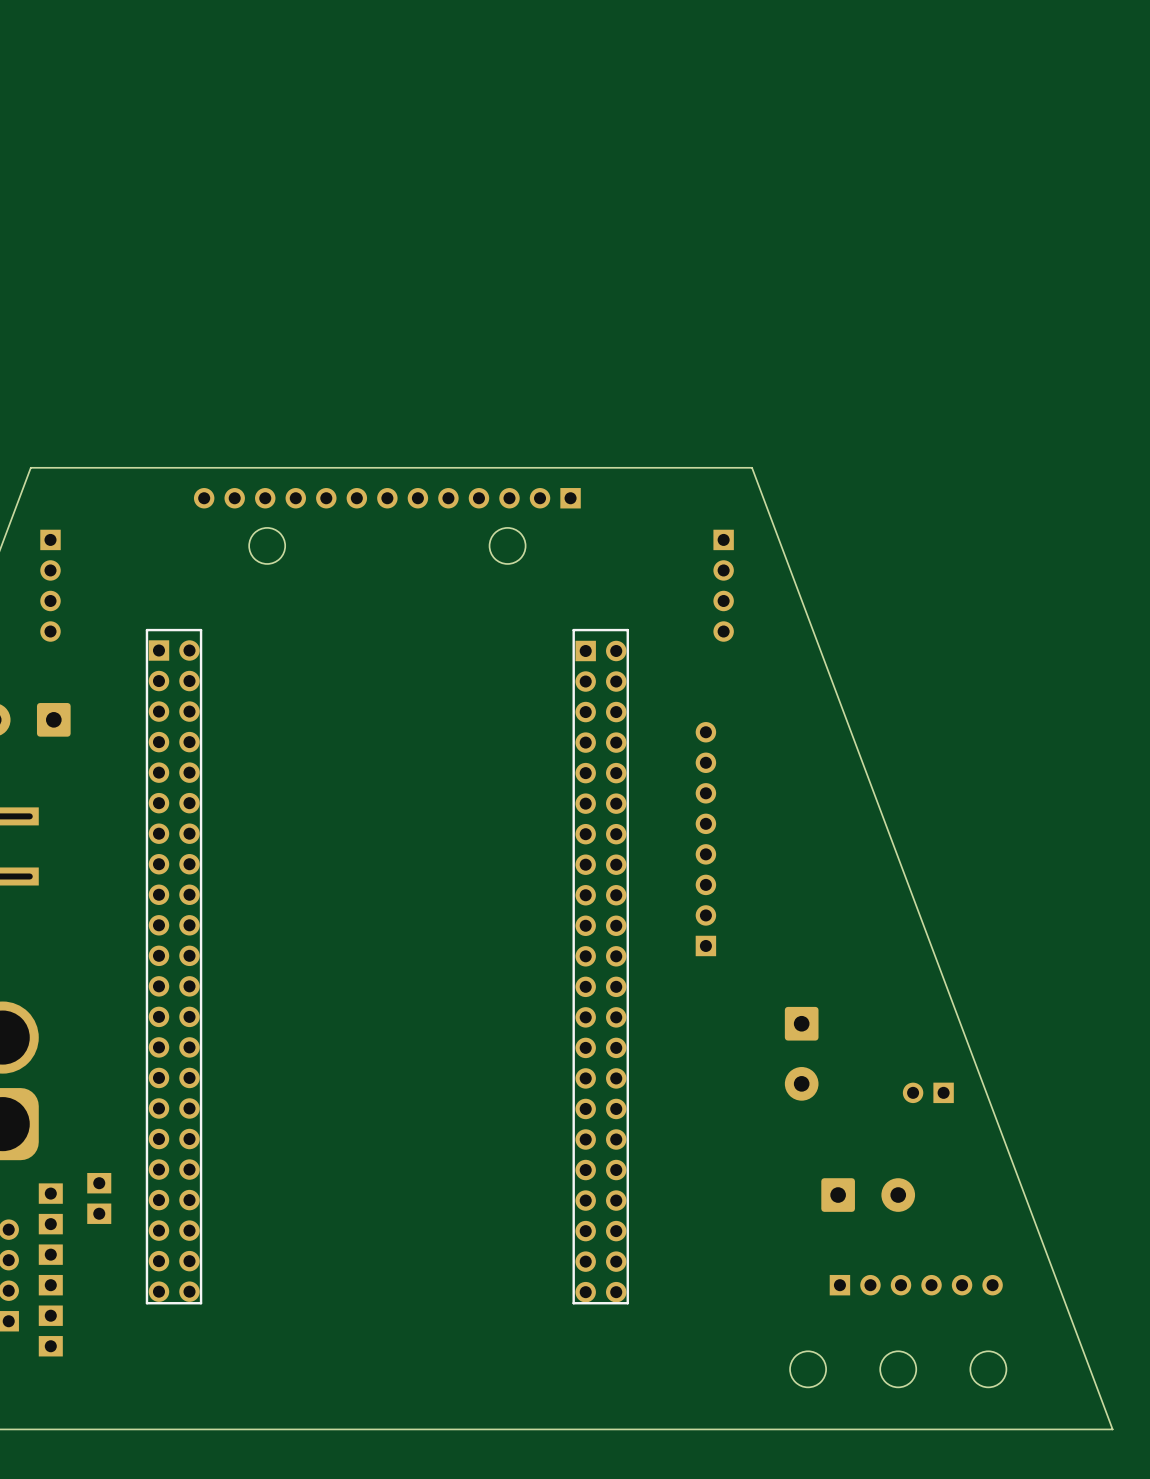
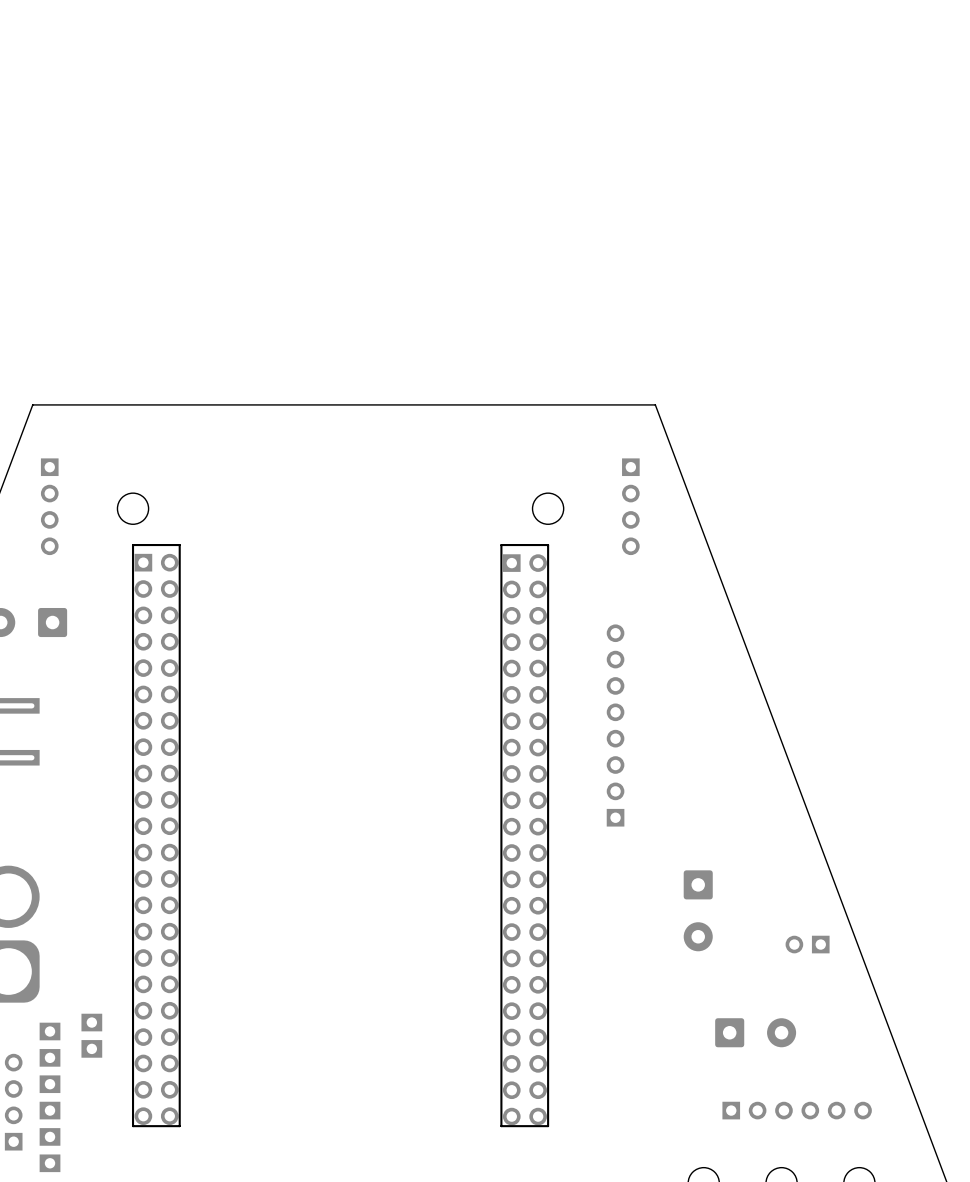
part: (387, 498) -> none
round board edge position: (267, 545) -> (133, 508)
round board edge position: (507, 545) -> (548, 508)

